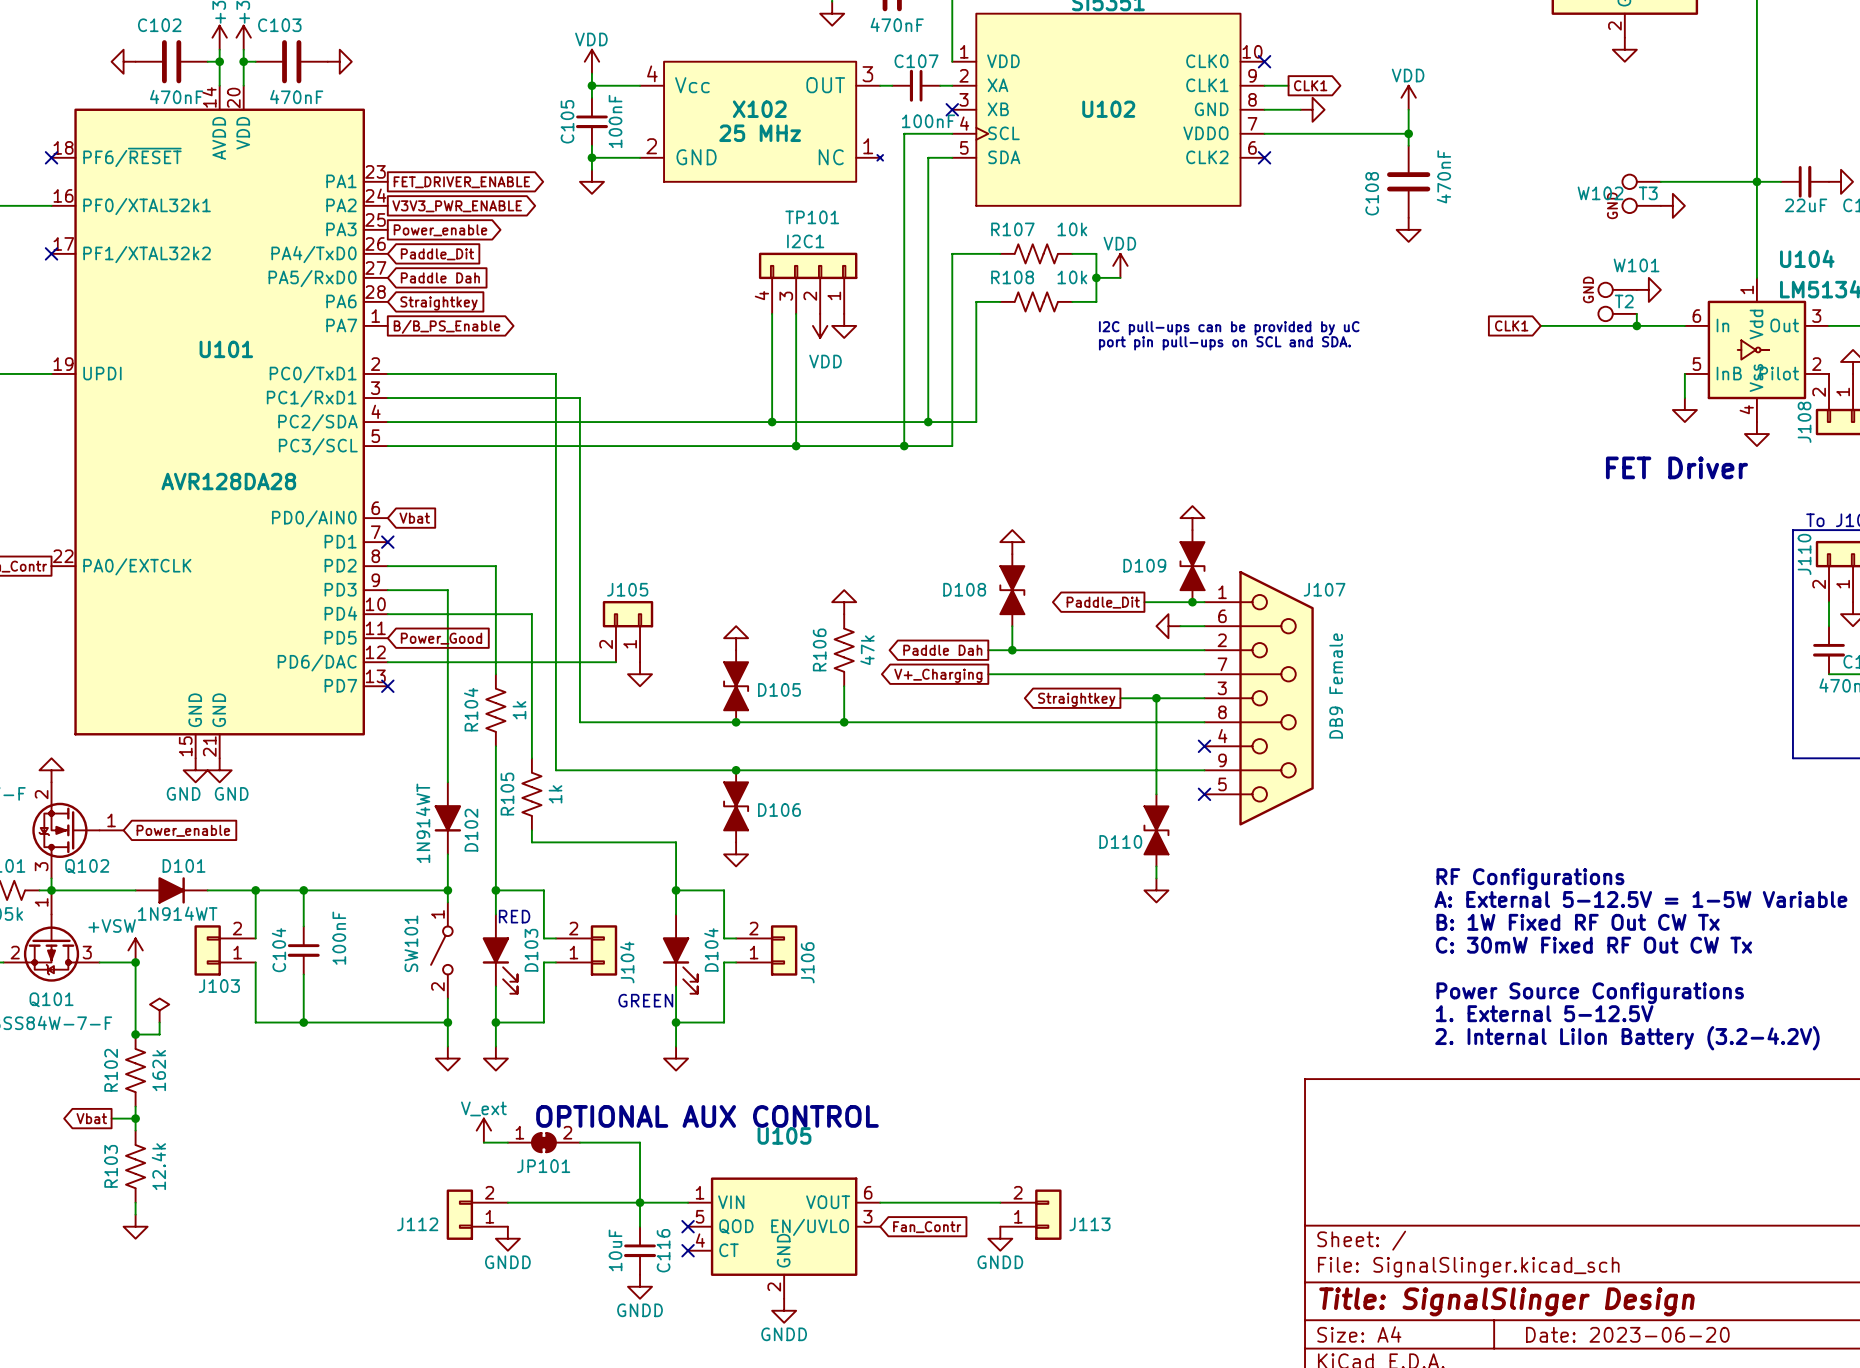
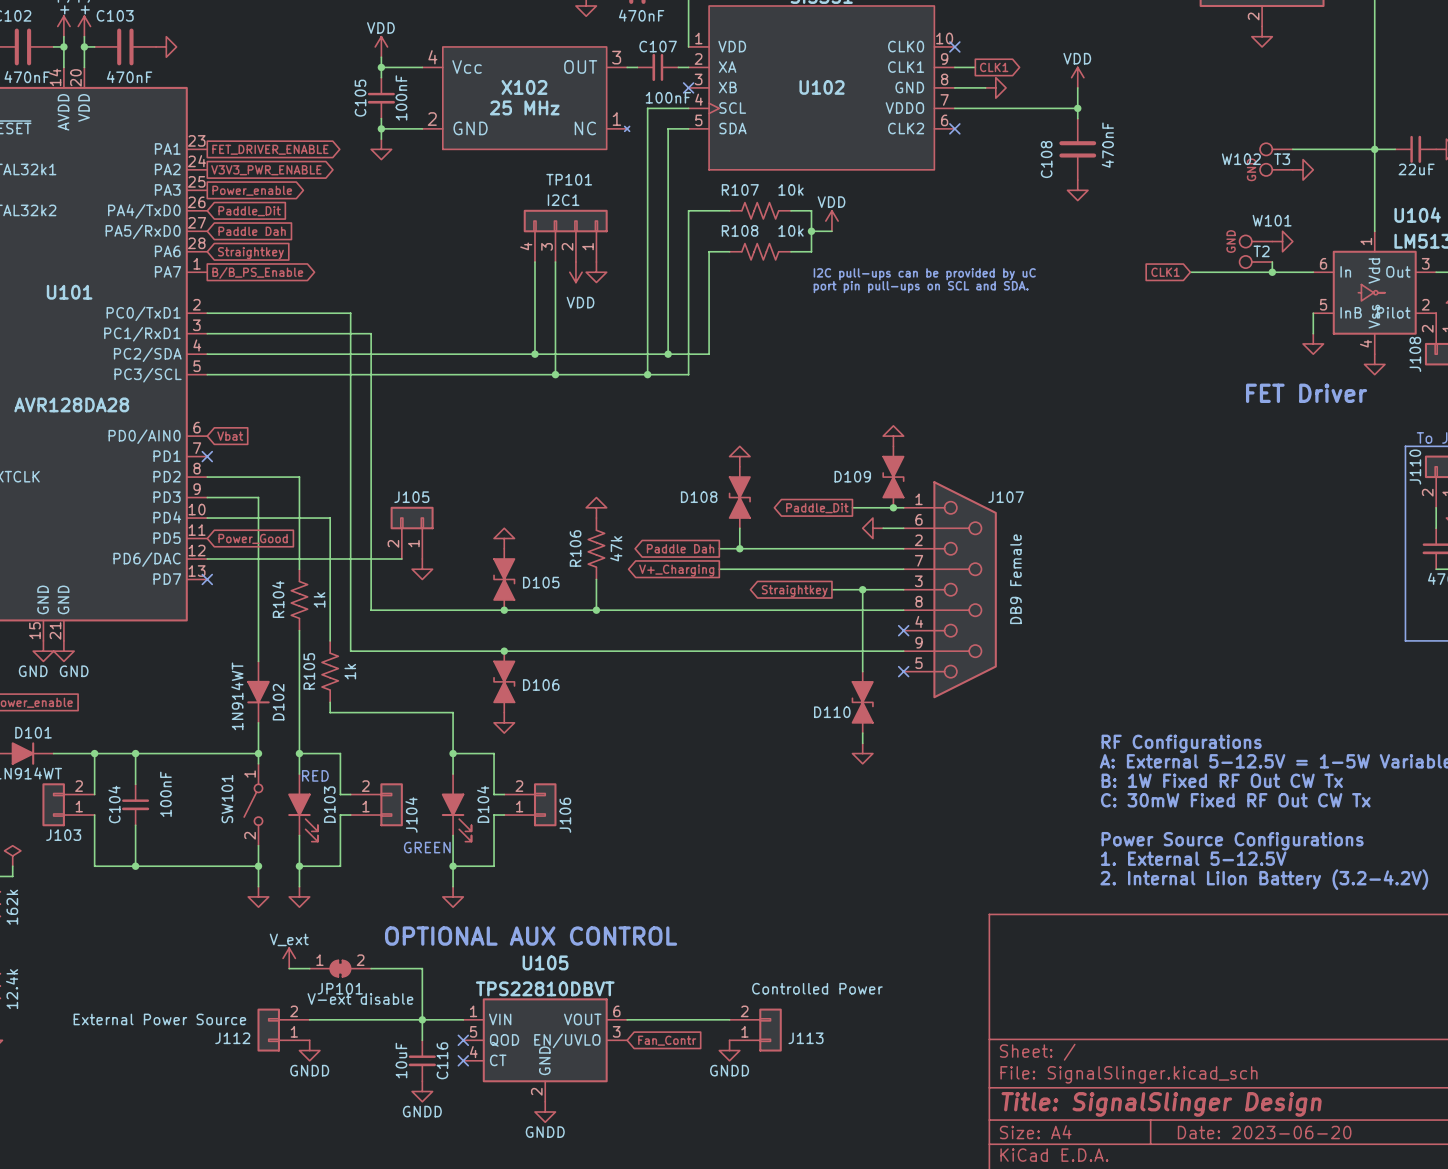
text position: OPTIONAL AUX CONTROL (707, 1116) -> OPTIONAL AUX CONTROL (531, 936)
U105 value: none -> TPS22810DBVT (545, 988)
J113 value: none -> Controlled Power (817, 988)
JP101 value: none -> V-ext disable (360, 998)
J112 value: none -> External Power Source (159, 1019)

